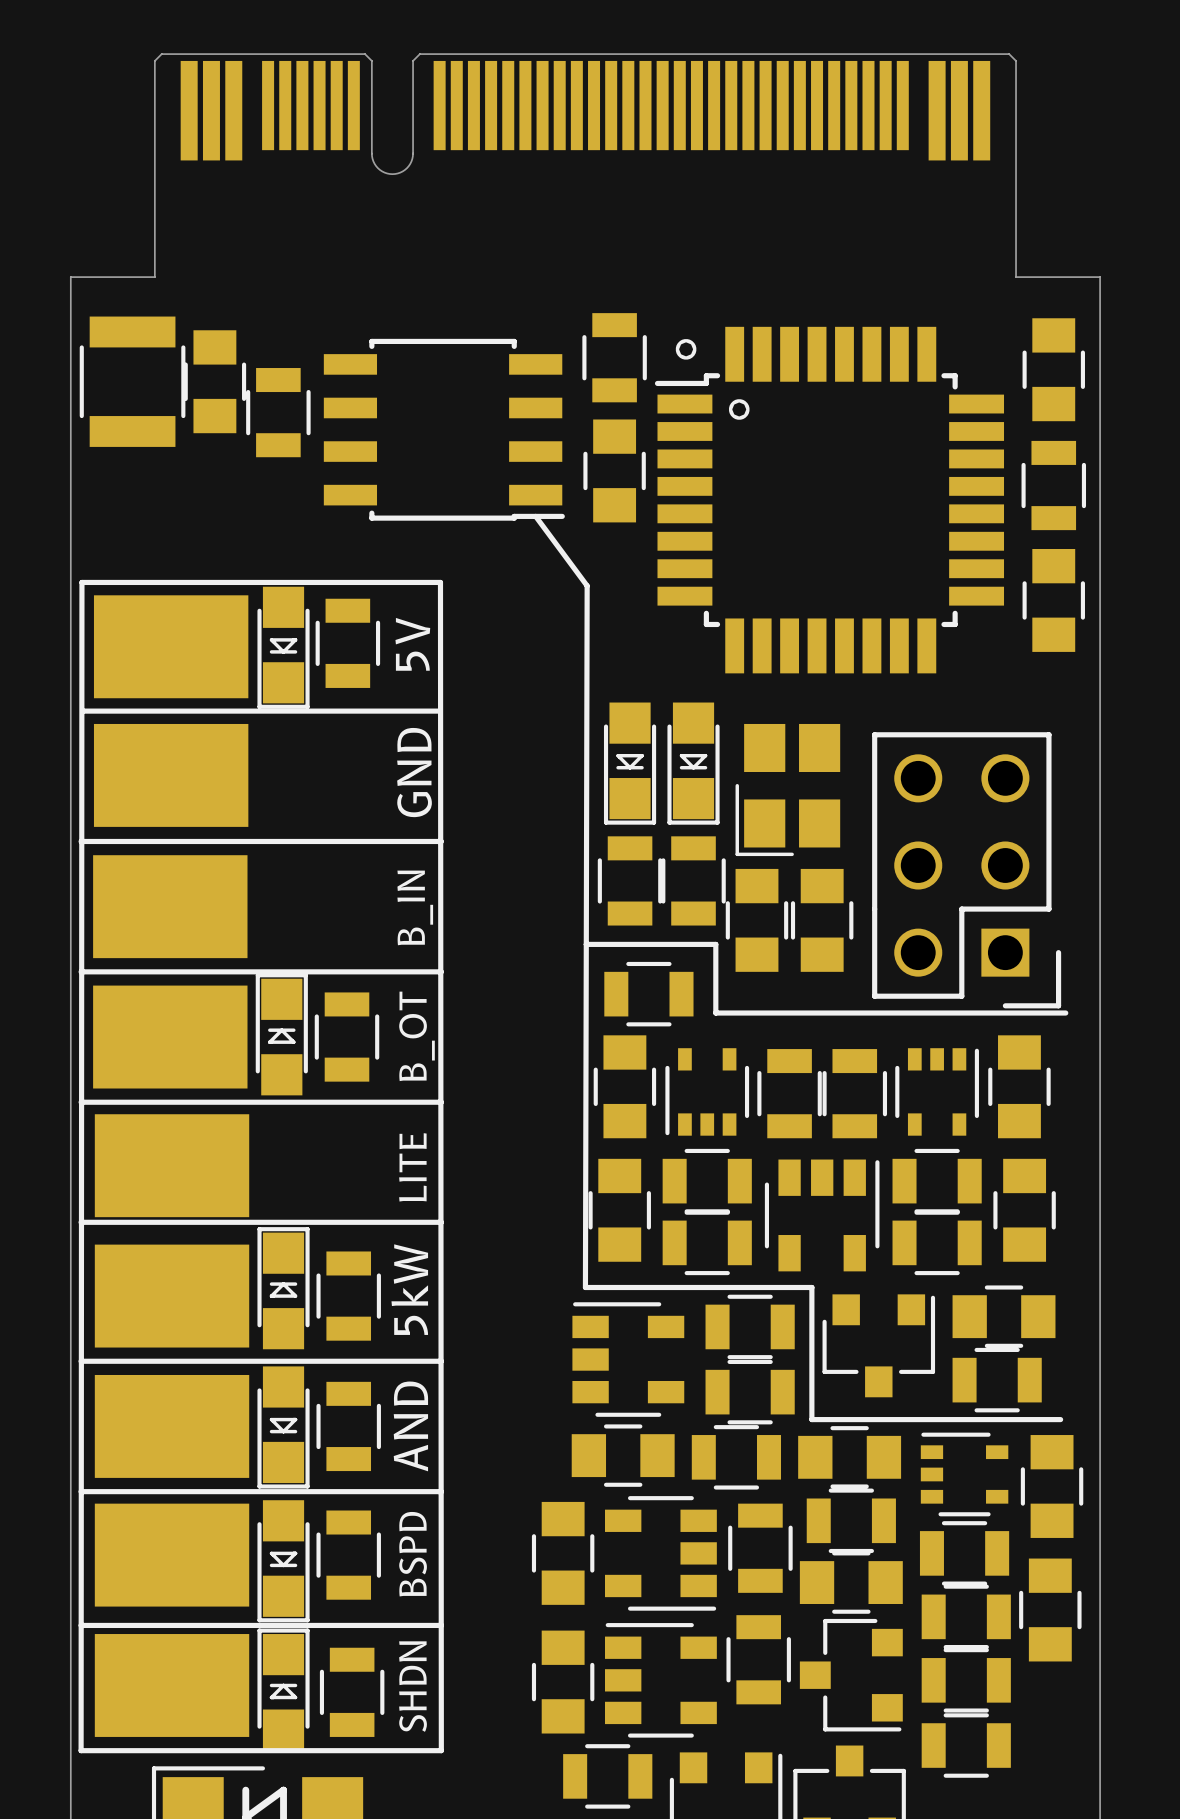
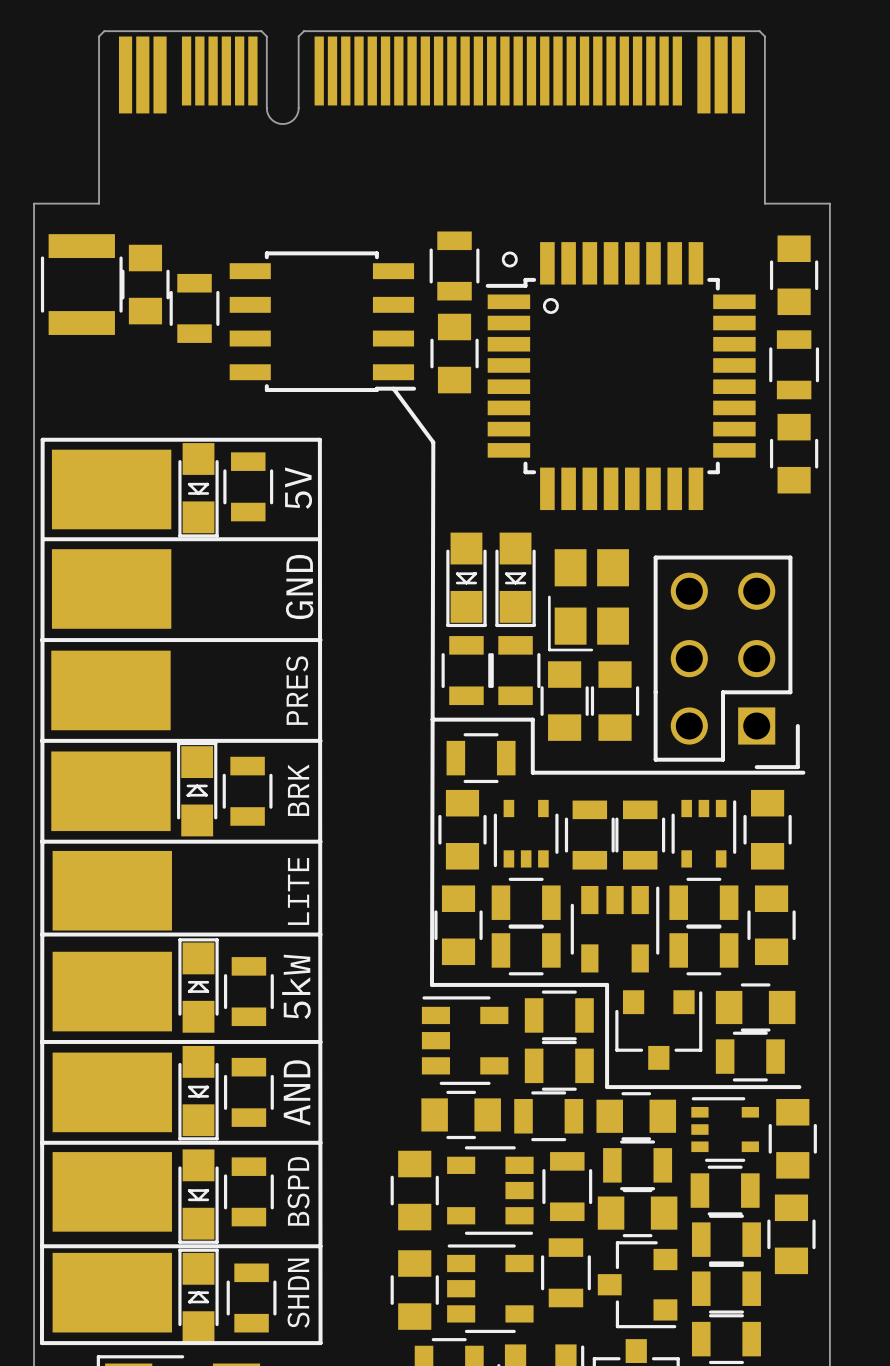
part value: B_IN (415, 907) -> PRES (297, 690)
part value: B_OT (417, 1036) -> BRK (298, 790)

